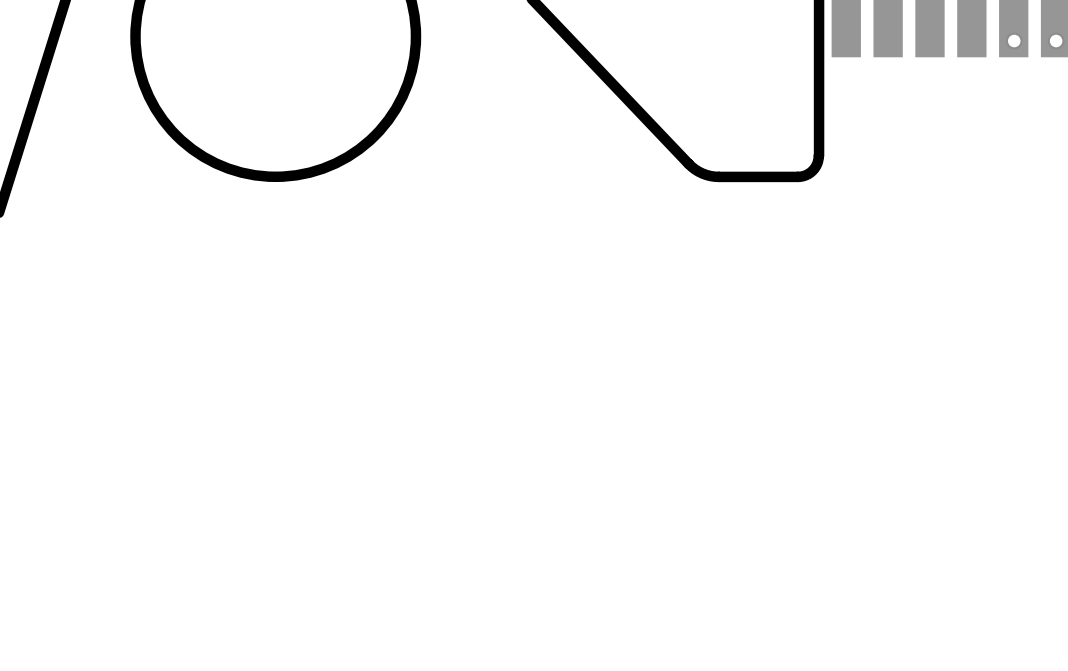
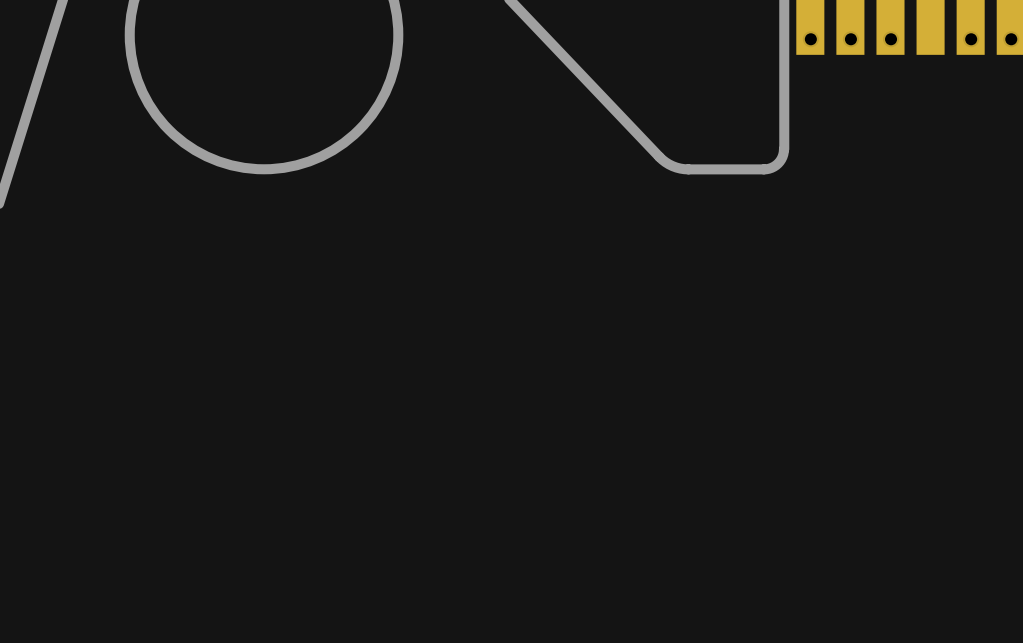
via: none -> (810, 39)
via: none -> (850, 39)
via: none -> (891, 39)

